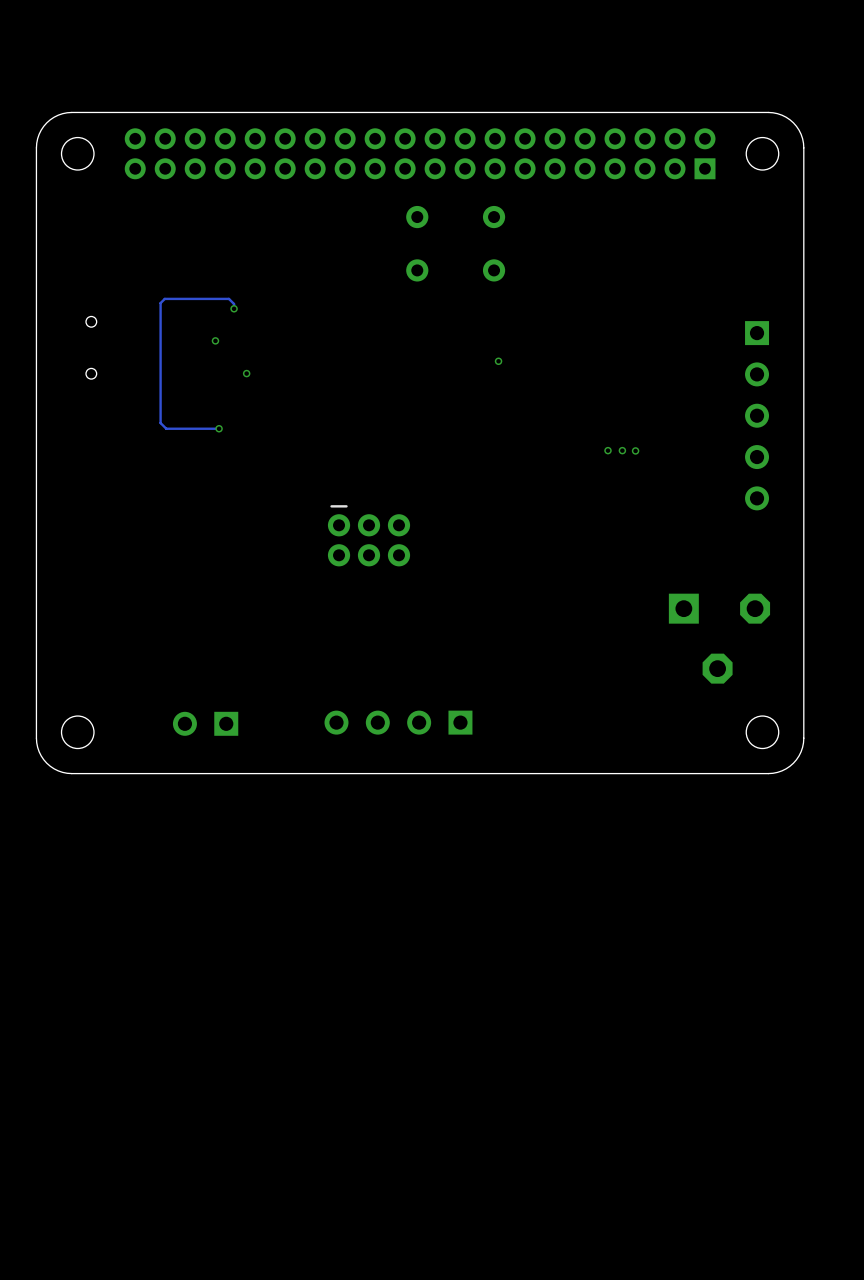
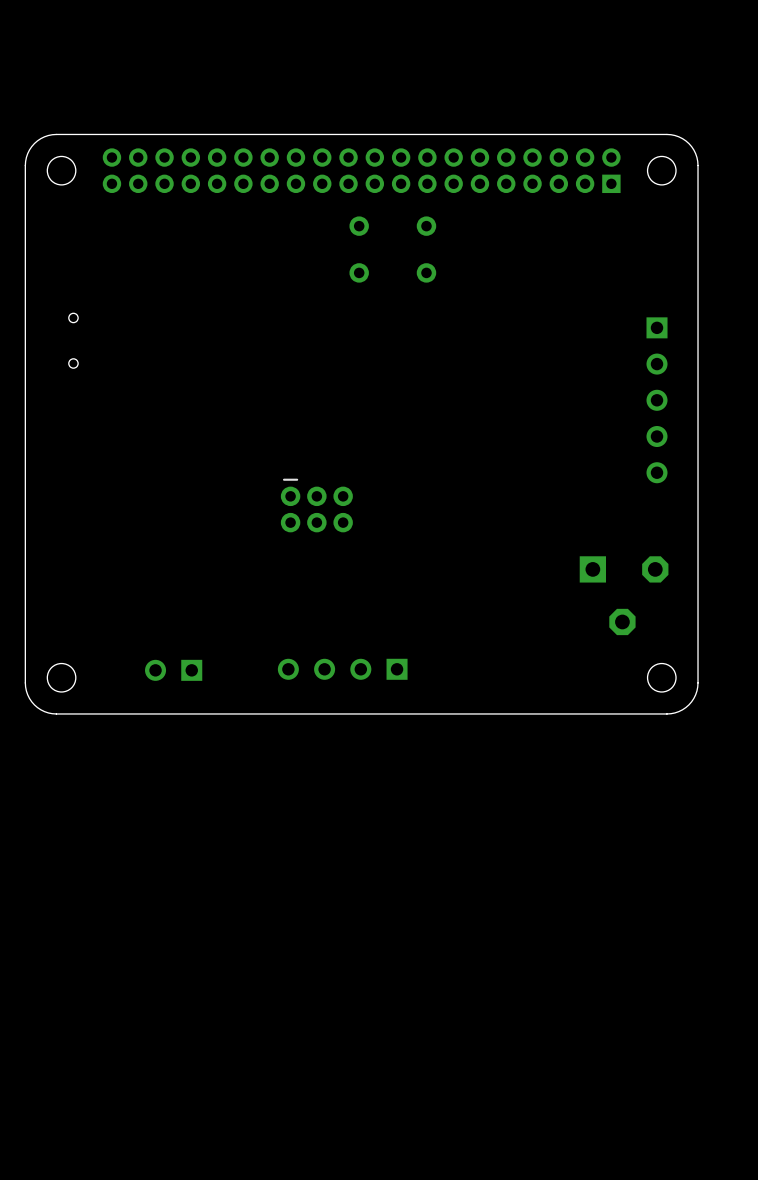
track: (234, 308) (234, 304) (228, 298) (164, 298) (160, 303) (160, 423) (166, 428) (219, 428) -> none
via: (234, 308) -> none
via: (215, 340) -> none
via: (498, 361) -> none
via: (246, 373) -> none
via: (219, 428) -> none
via: (607, 450) -> none
via: (622, 450) -> none
via: (635, 450) -> none

